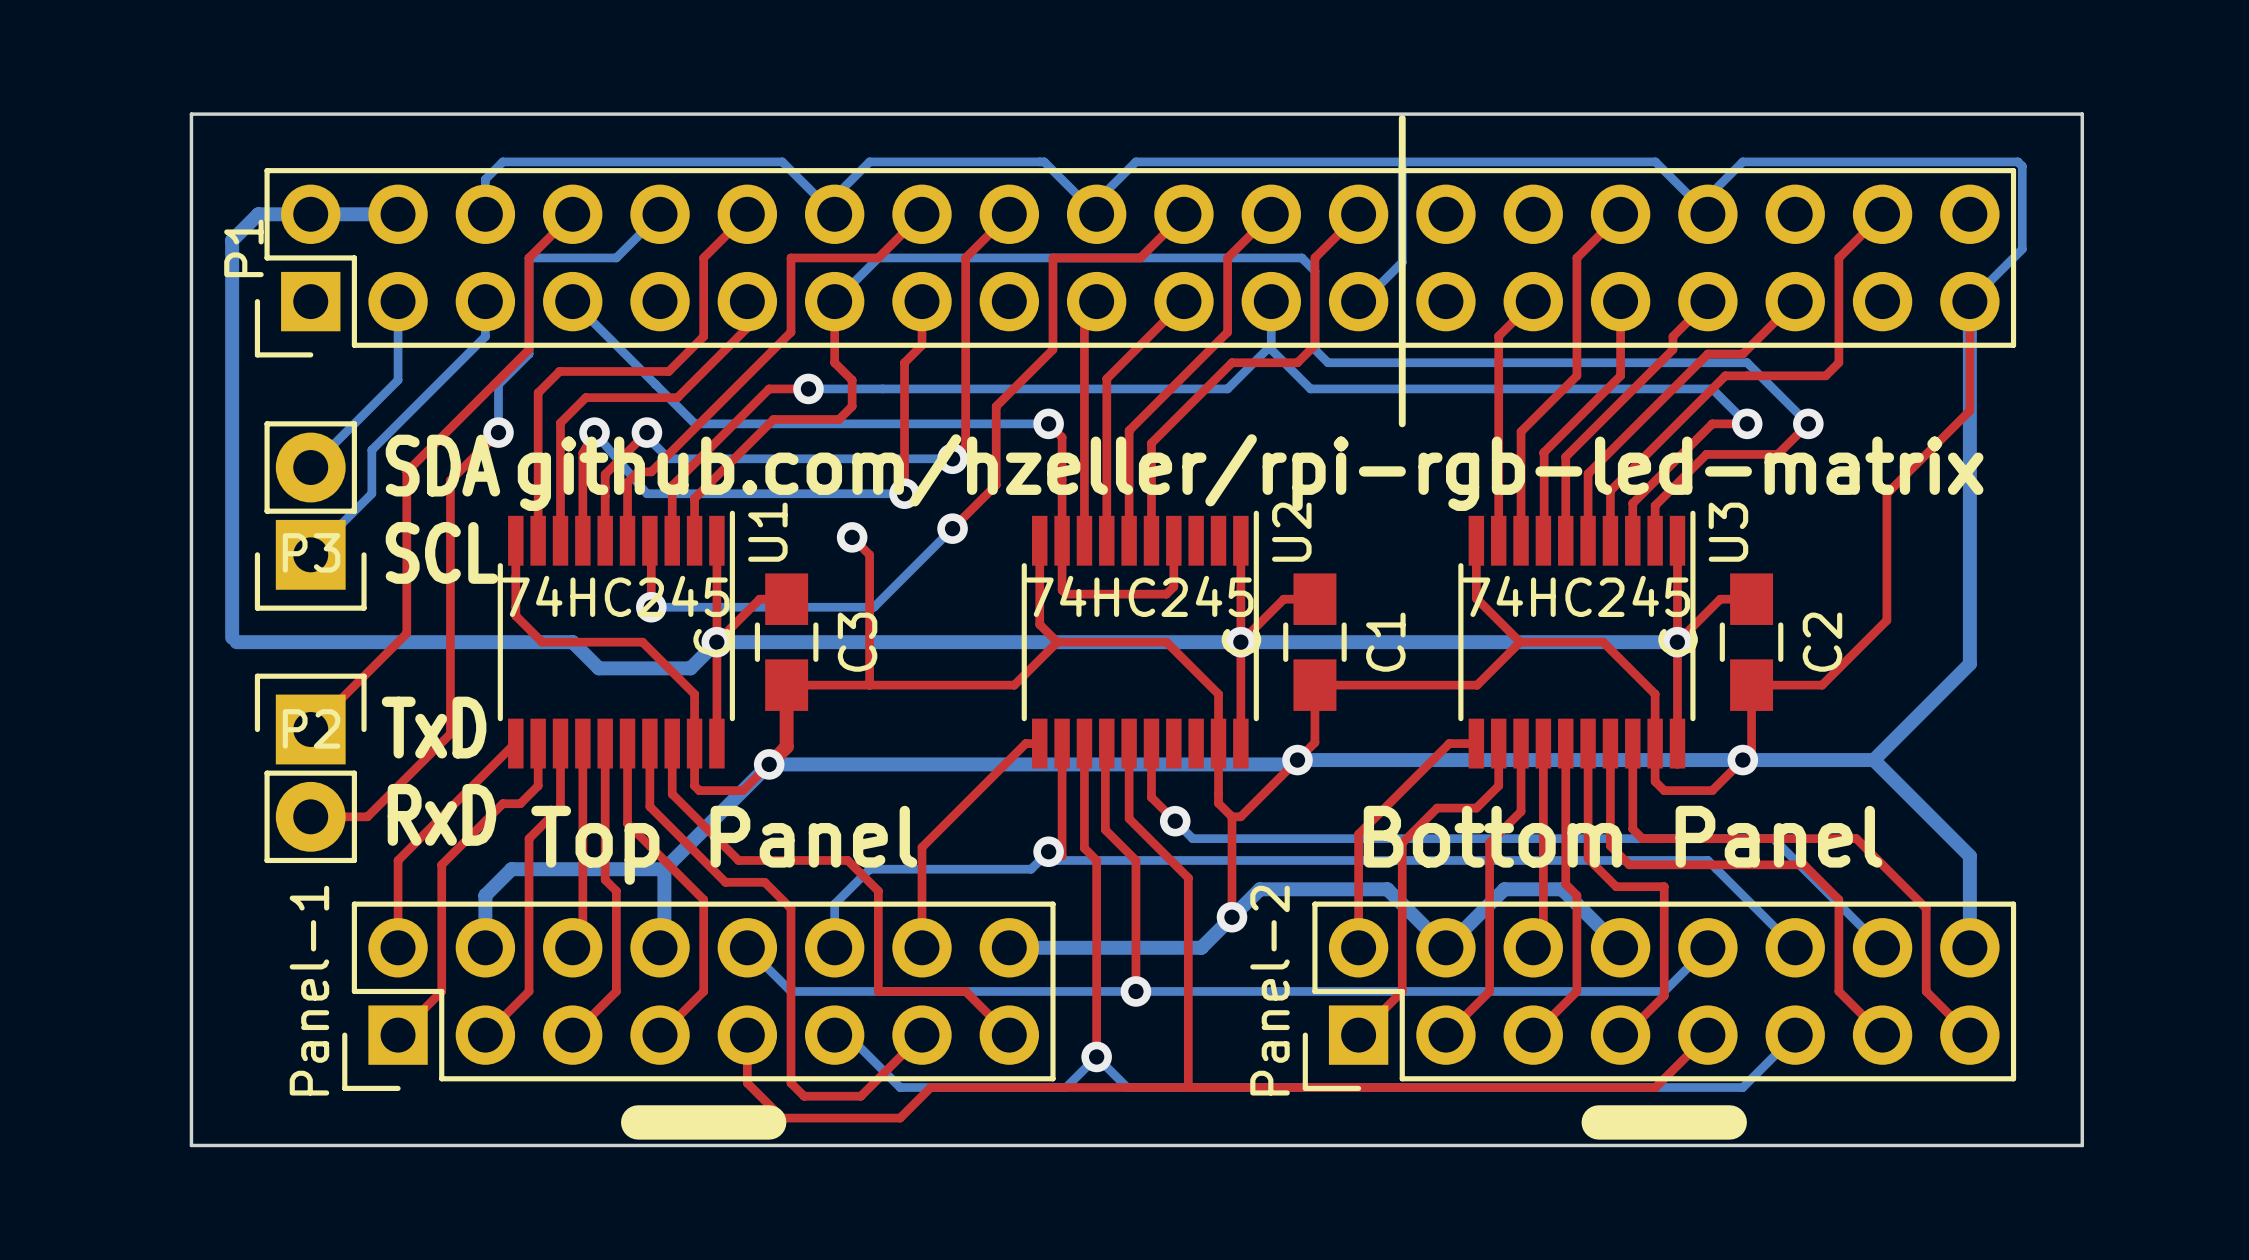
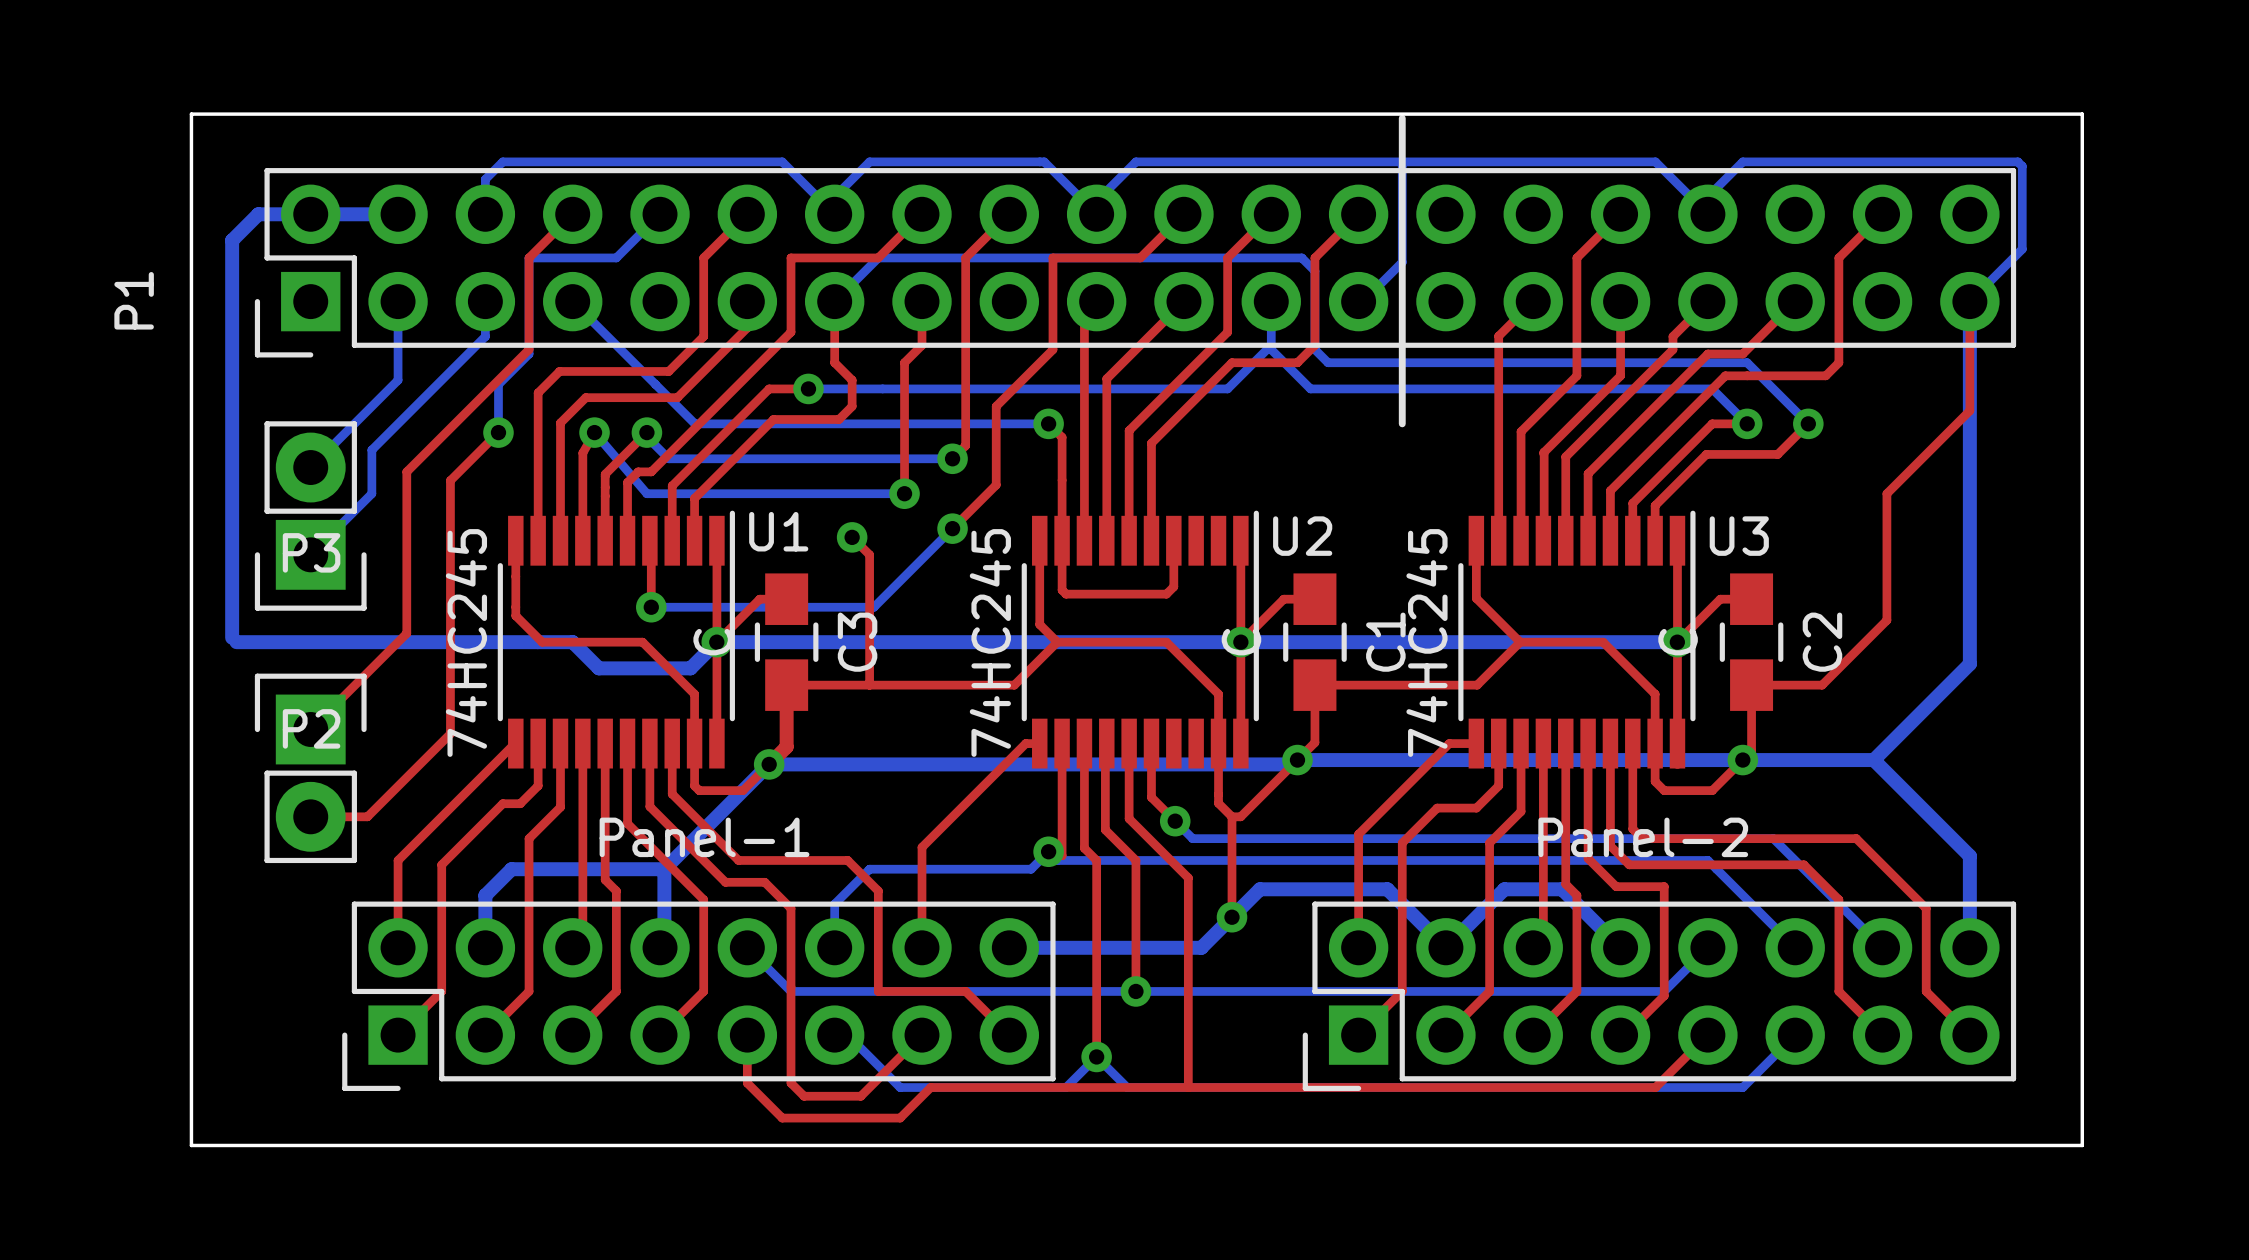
P1 name position: P1 (243, 248) -> P1 (134, 300)
text: SDA (442, 465) -> none
text: github.com/hzeller/rpi-rgb-led-matrix (1250, 472) -> none
U1 name rotation: 0° (767, 532) -> 90° clockwise (778, 531)
U2 name rotation: 0° (1291, 532) -> 90° clockwise (1302, 536)
U3 name rotation: 0° (1728, 532) -> 90° clockwise (1739, 536)
text: SCL (441, 552) -> none
U1 value rotation: 0° (615, 596) -> 90° counterclockwise (466, 642)
U2 value rotation: 0° (1139, 596) -> 90° counterclockwise (990, 642)
U3 value rotation: 0° (1576, 596) -> 90° counterclockwise (1426, 642)
text: TxD (434, 727) -> none
text: RxD (441, 814) -> none
text: Bottom Panel (1623, 836) -> none
text: Top Panel (724, 845) -> none
Panel-1 name rotation: 0° (309, 990) -> 90° clockwise (704, 837)
Panel-1 name position: Panel-1 (309, 990) -> Panel-1 (704, 837)
Panel-2 name rotation: 0° (1270, 990) -> 90° clockwise (1643, 837)
Panel-2 name position: Panel-2 (1270, 990) -> Panel-2 (1643, 837)
line: (638, 1122) (769, 1122) -> none
line: (1598, 1122) (1729, 1122) -> none

